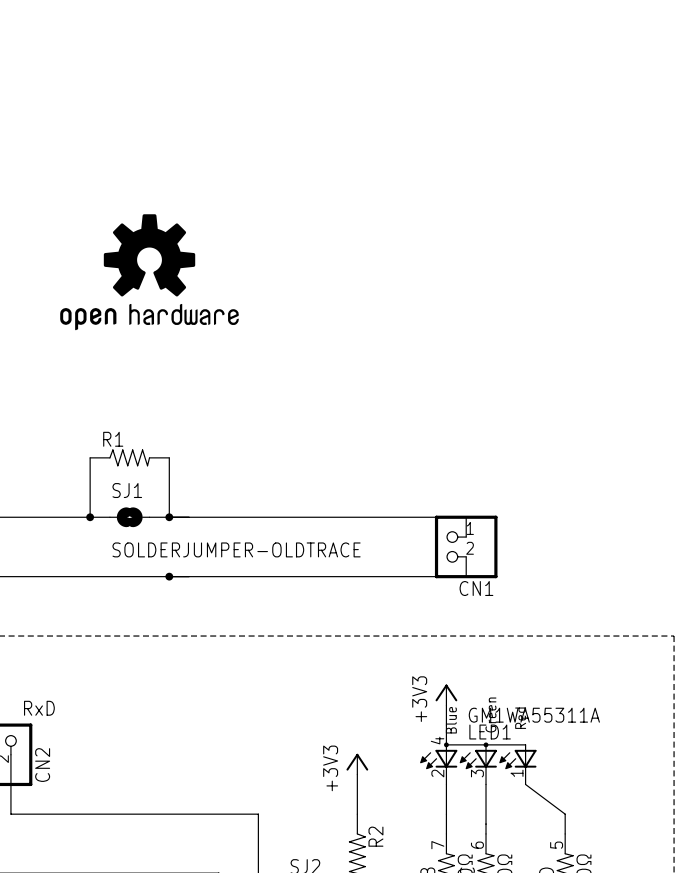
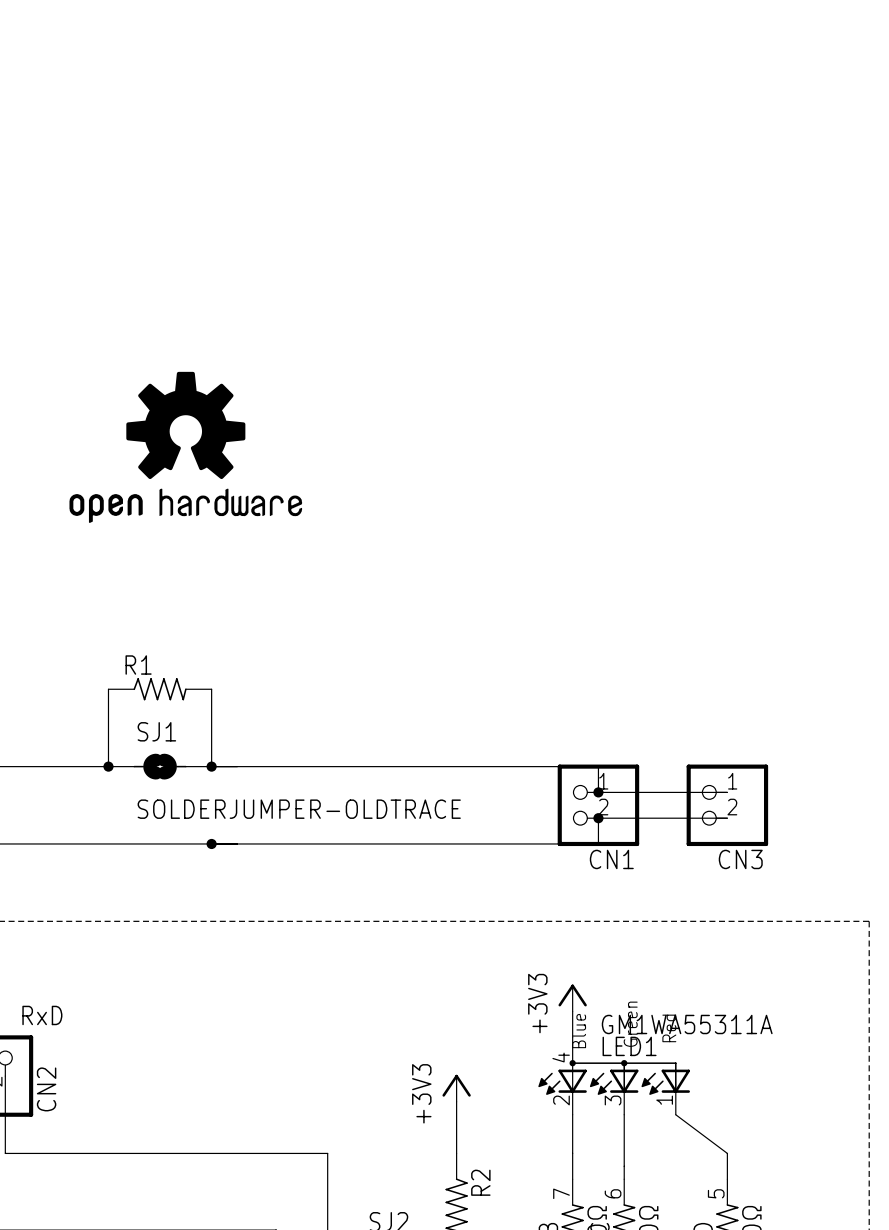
wire: none -> (598, 792) (727, 792)
junction: none -> (598, 792)
CN3: none -> (727, 805)
wire: none -> (598, 818) (727, 818)
junction: none -> (598, 818)

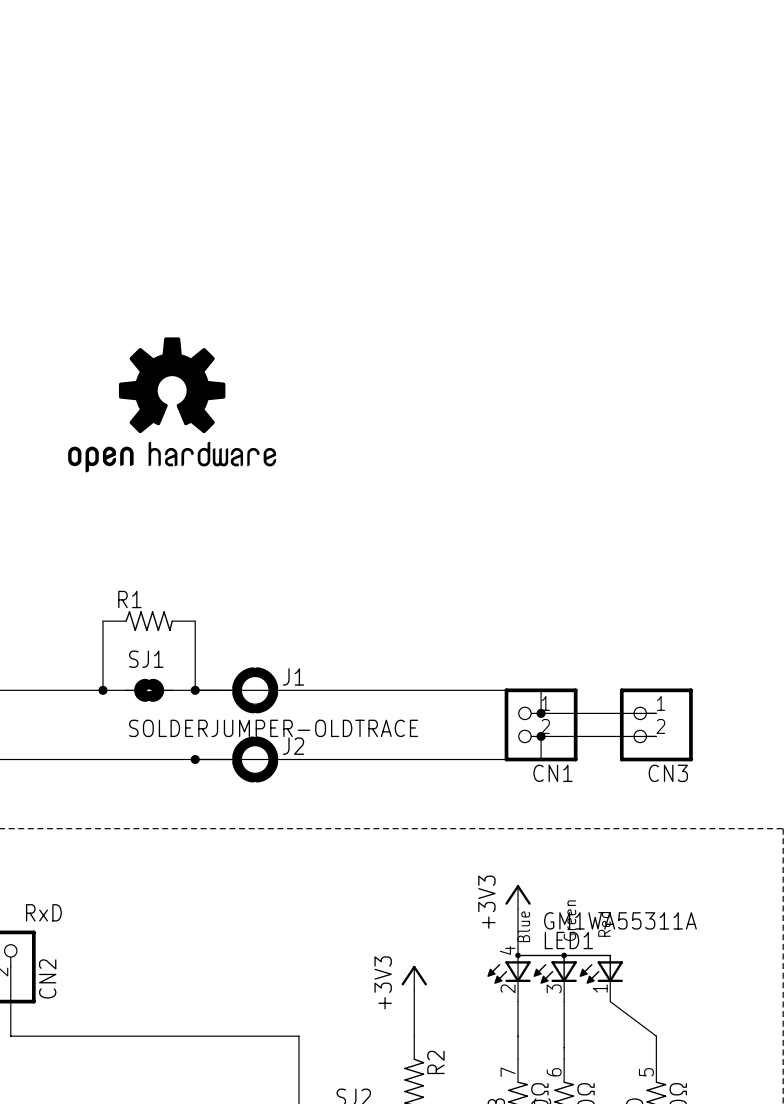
J1: none -> (248, 690)
J2: none -> (248, 759)

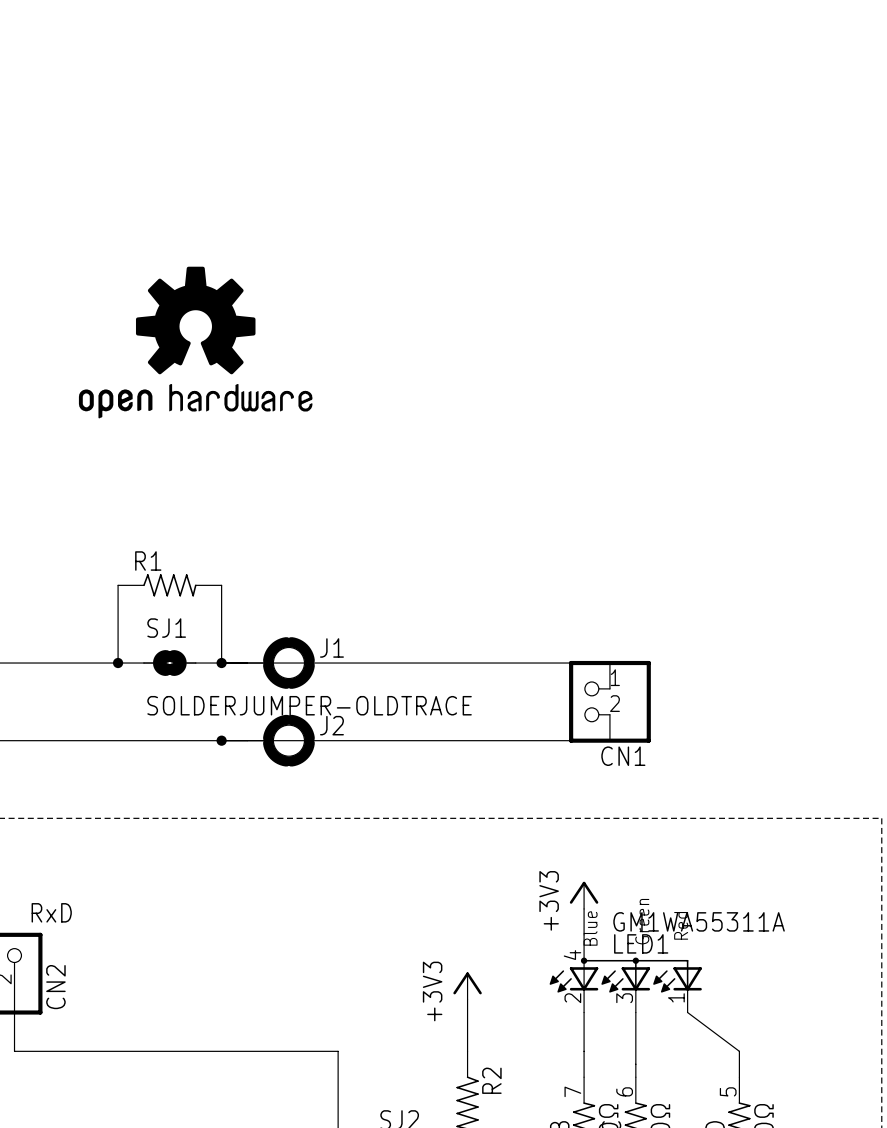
wire: (541, 713) (656, 713) -> none
junction: (541, 713) -> none
CN3: (656, 724) -> none
wire: (541, 736) (656, 736) -> none
junction: (541, 736) -> none

